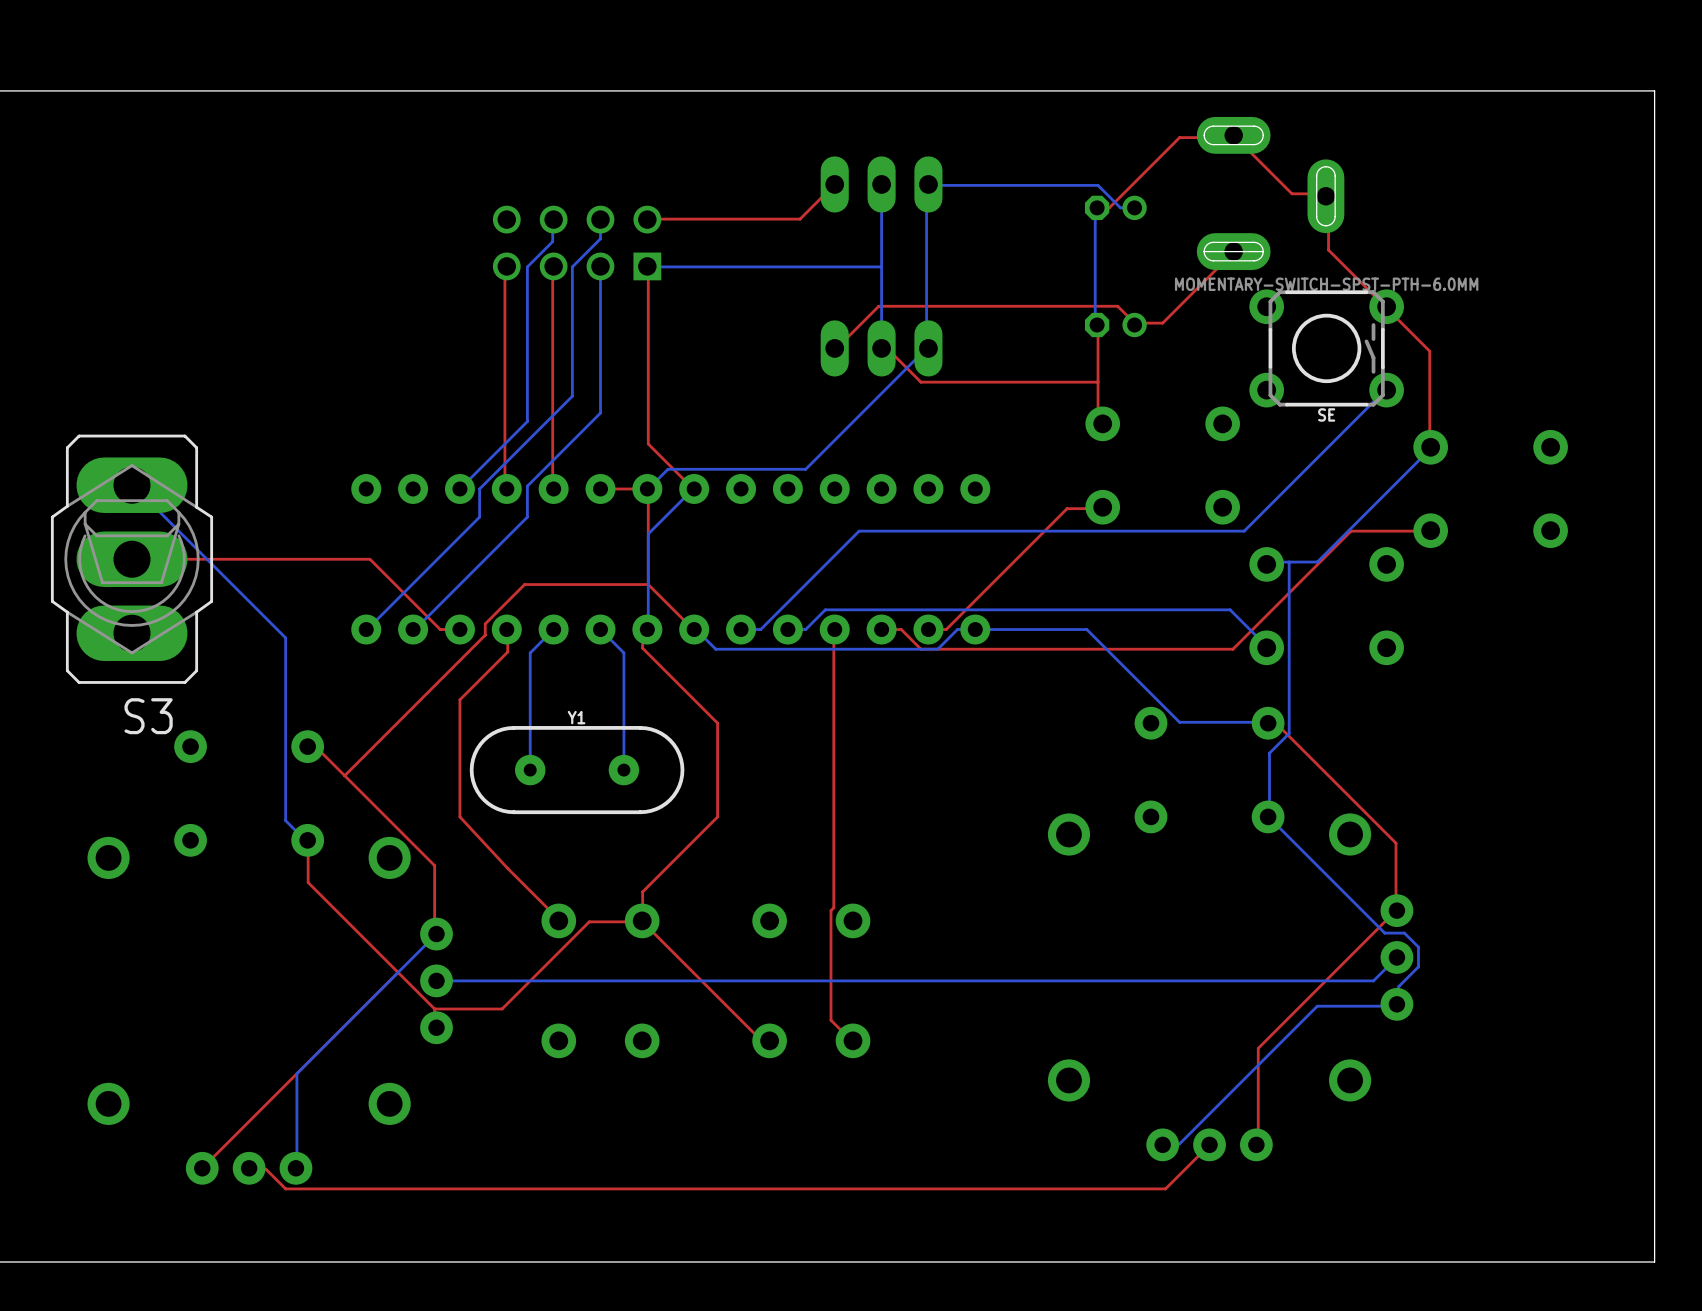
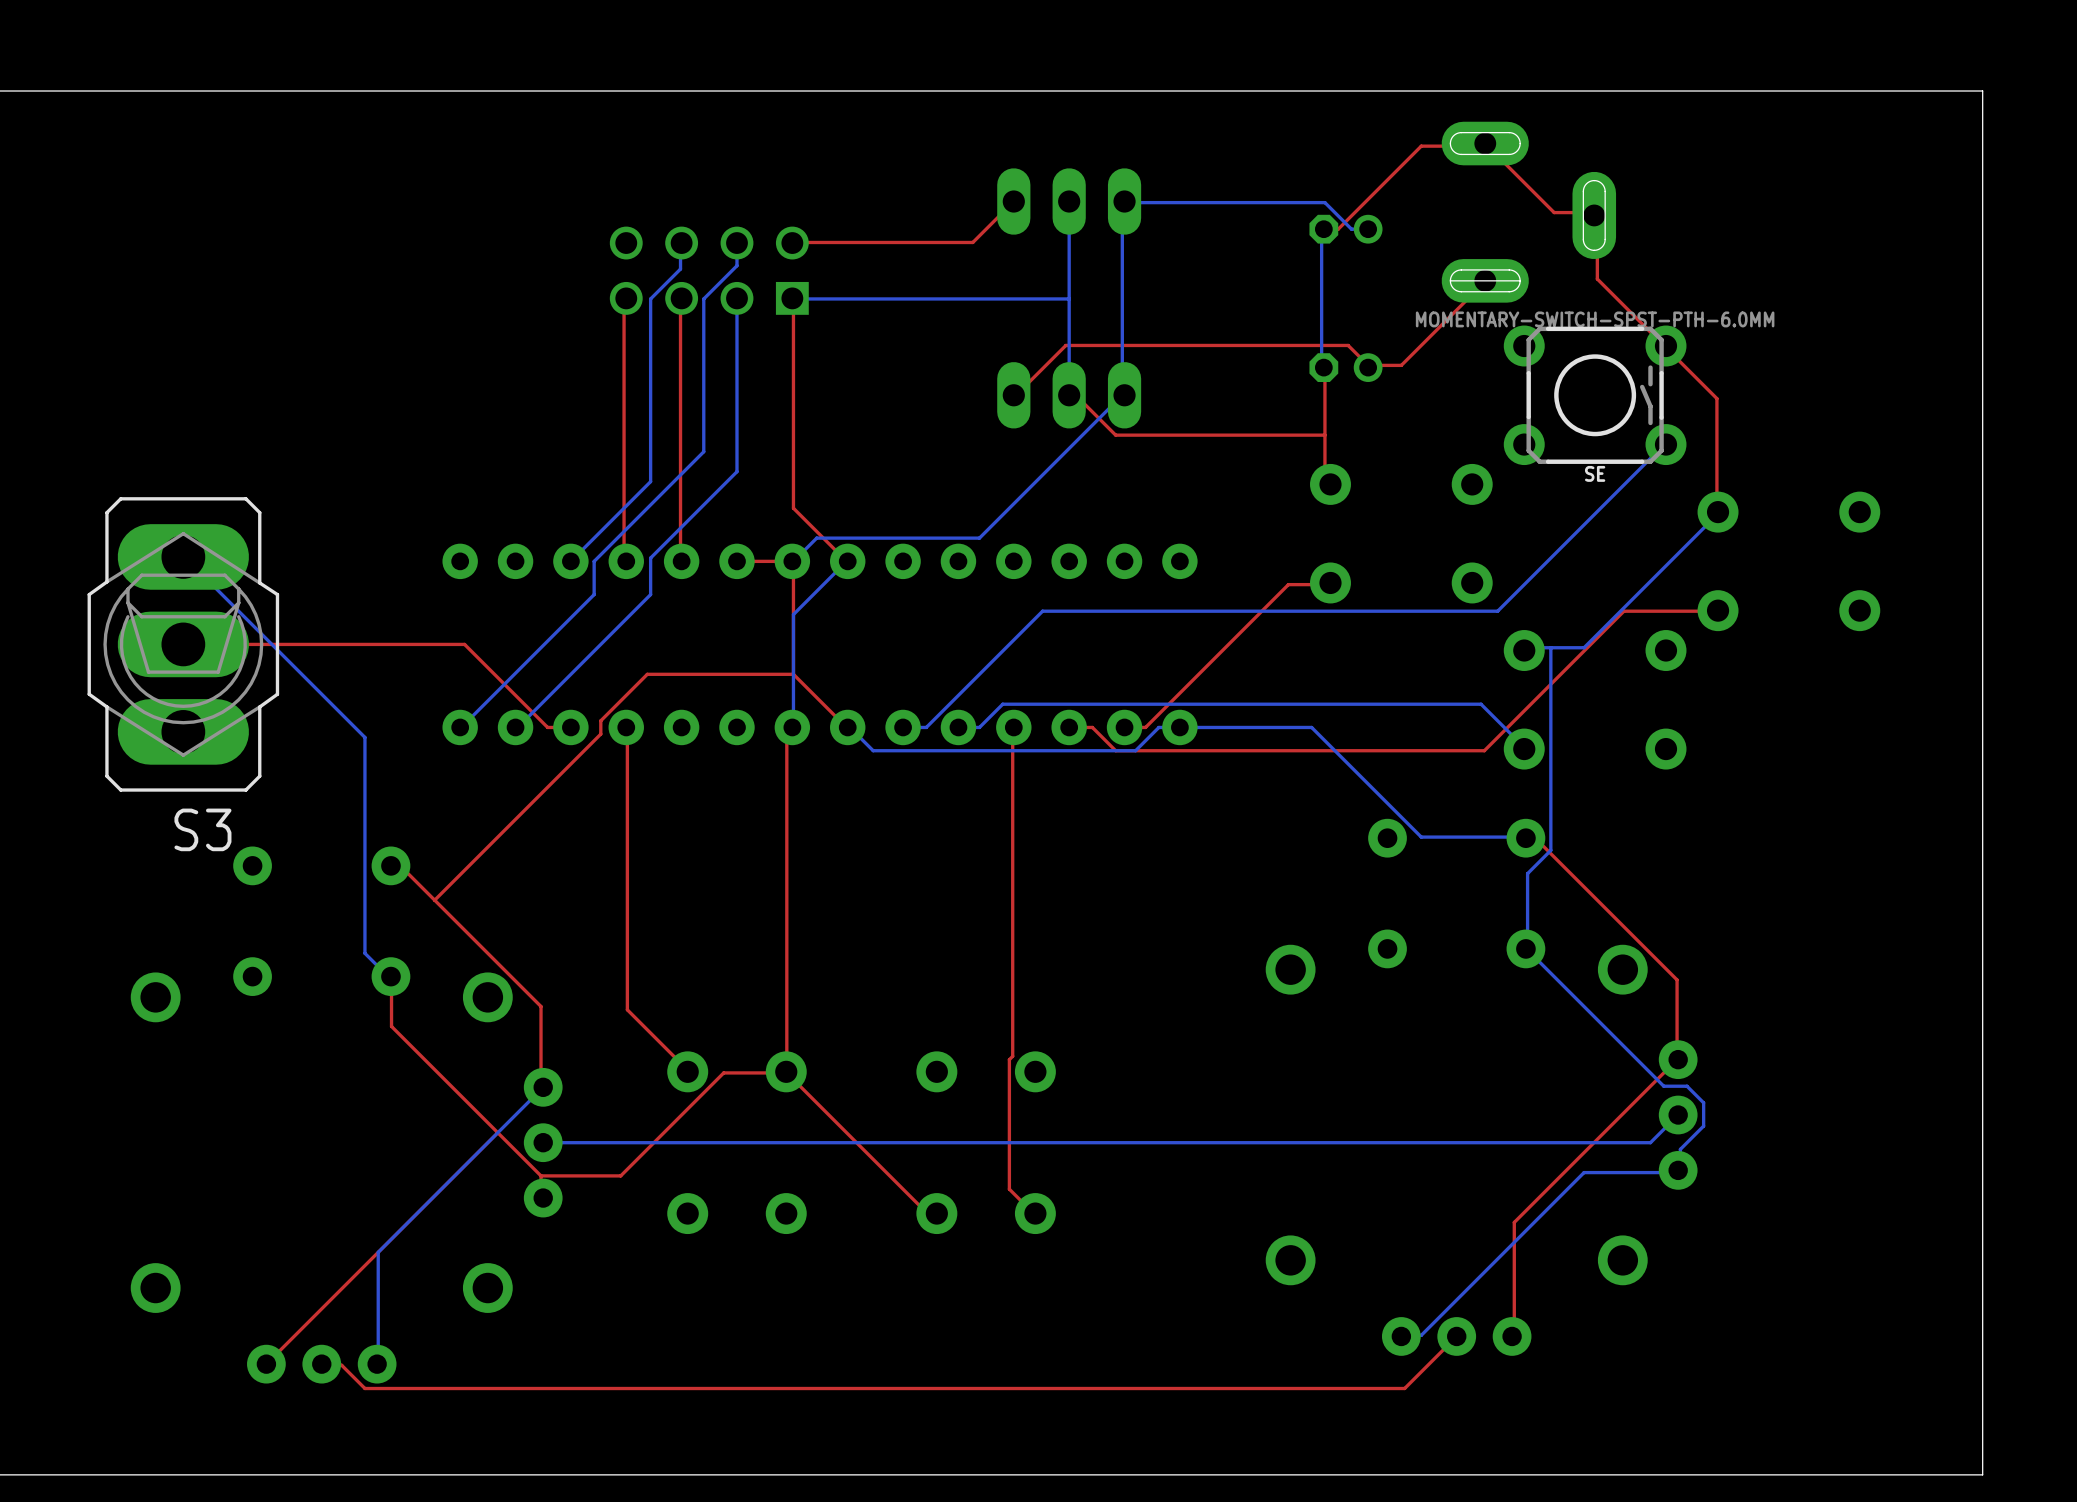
bottom track: (553, 629) (530, 652) (530, 770) -> none
bottom track: (600, 629) (623, 652) (623, 770) -> none
top track: (642, 648) (717, 723) (717, 816) (642, 891) -> (786, 749) (786, 1037)
top track: (507, 652) (459, 699) (459, 816) (507, 868) -> (627, 754) (627, 1009)
Y1: (577, 770) -> none

